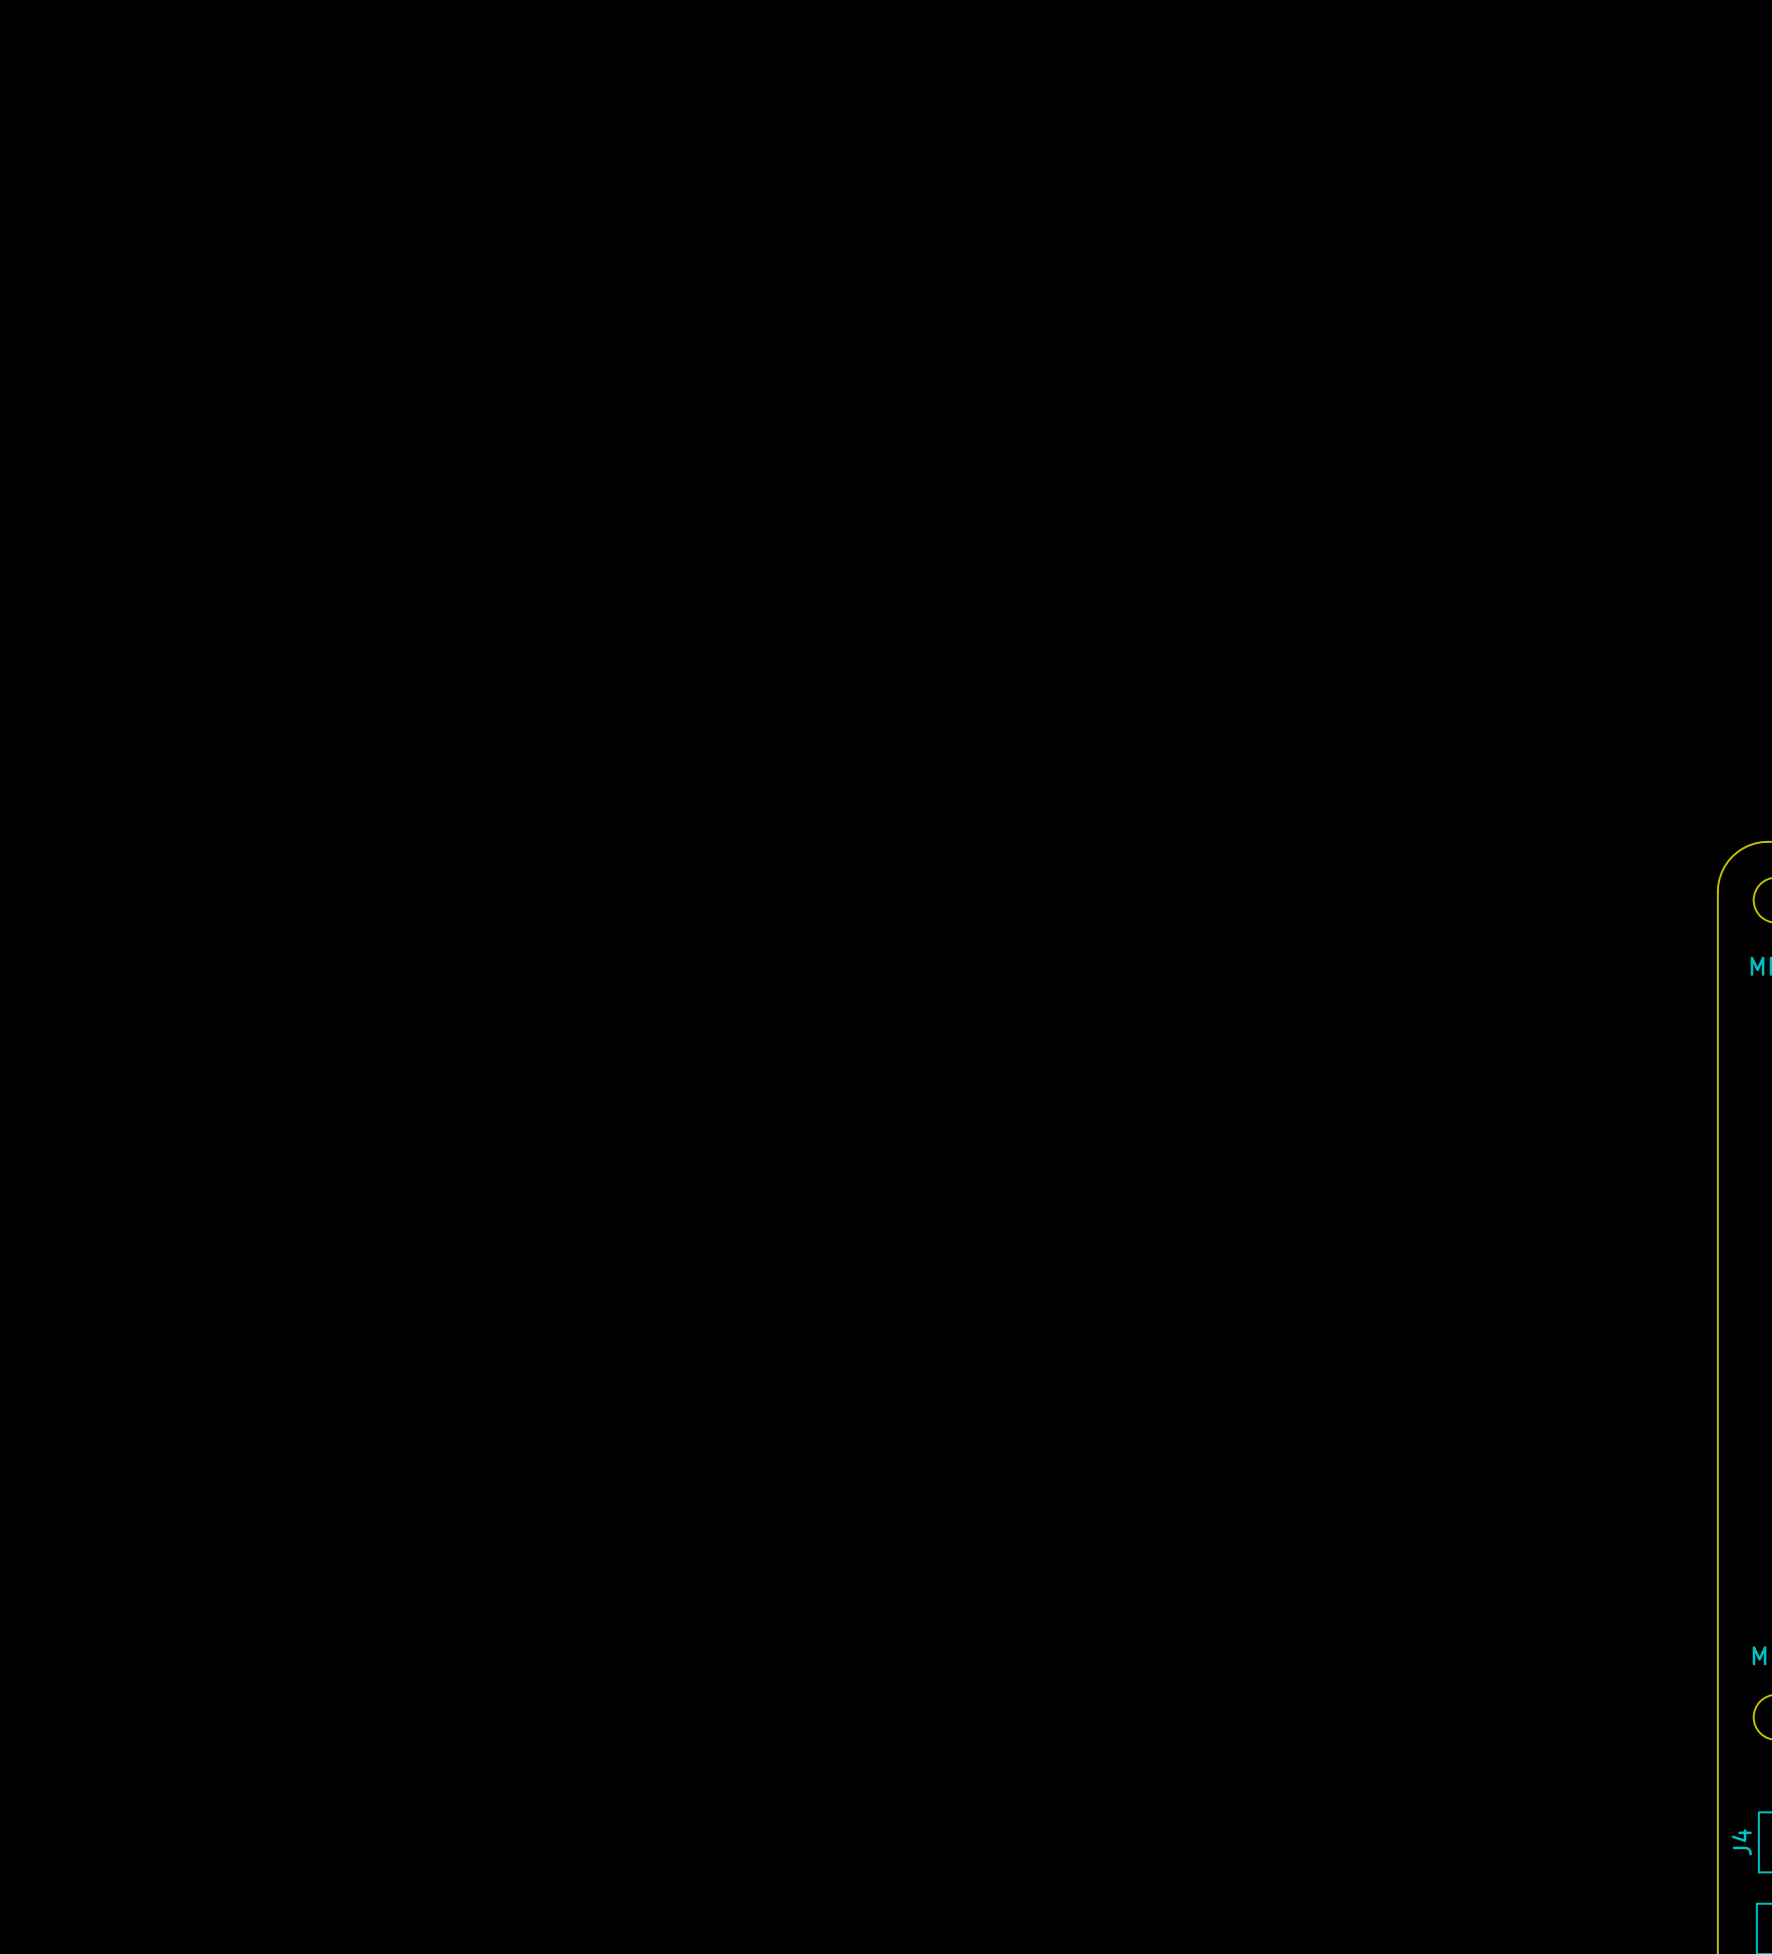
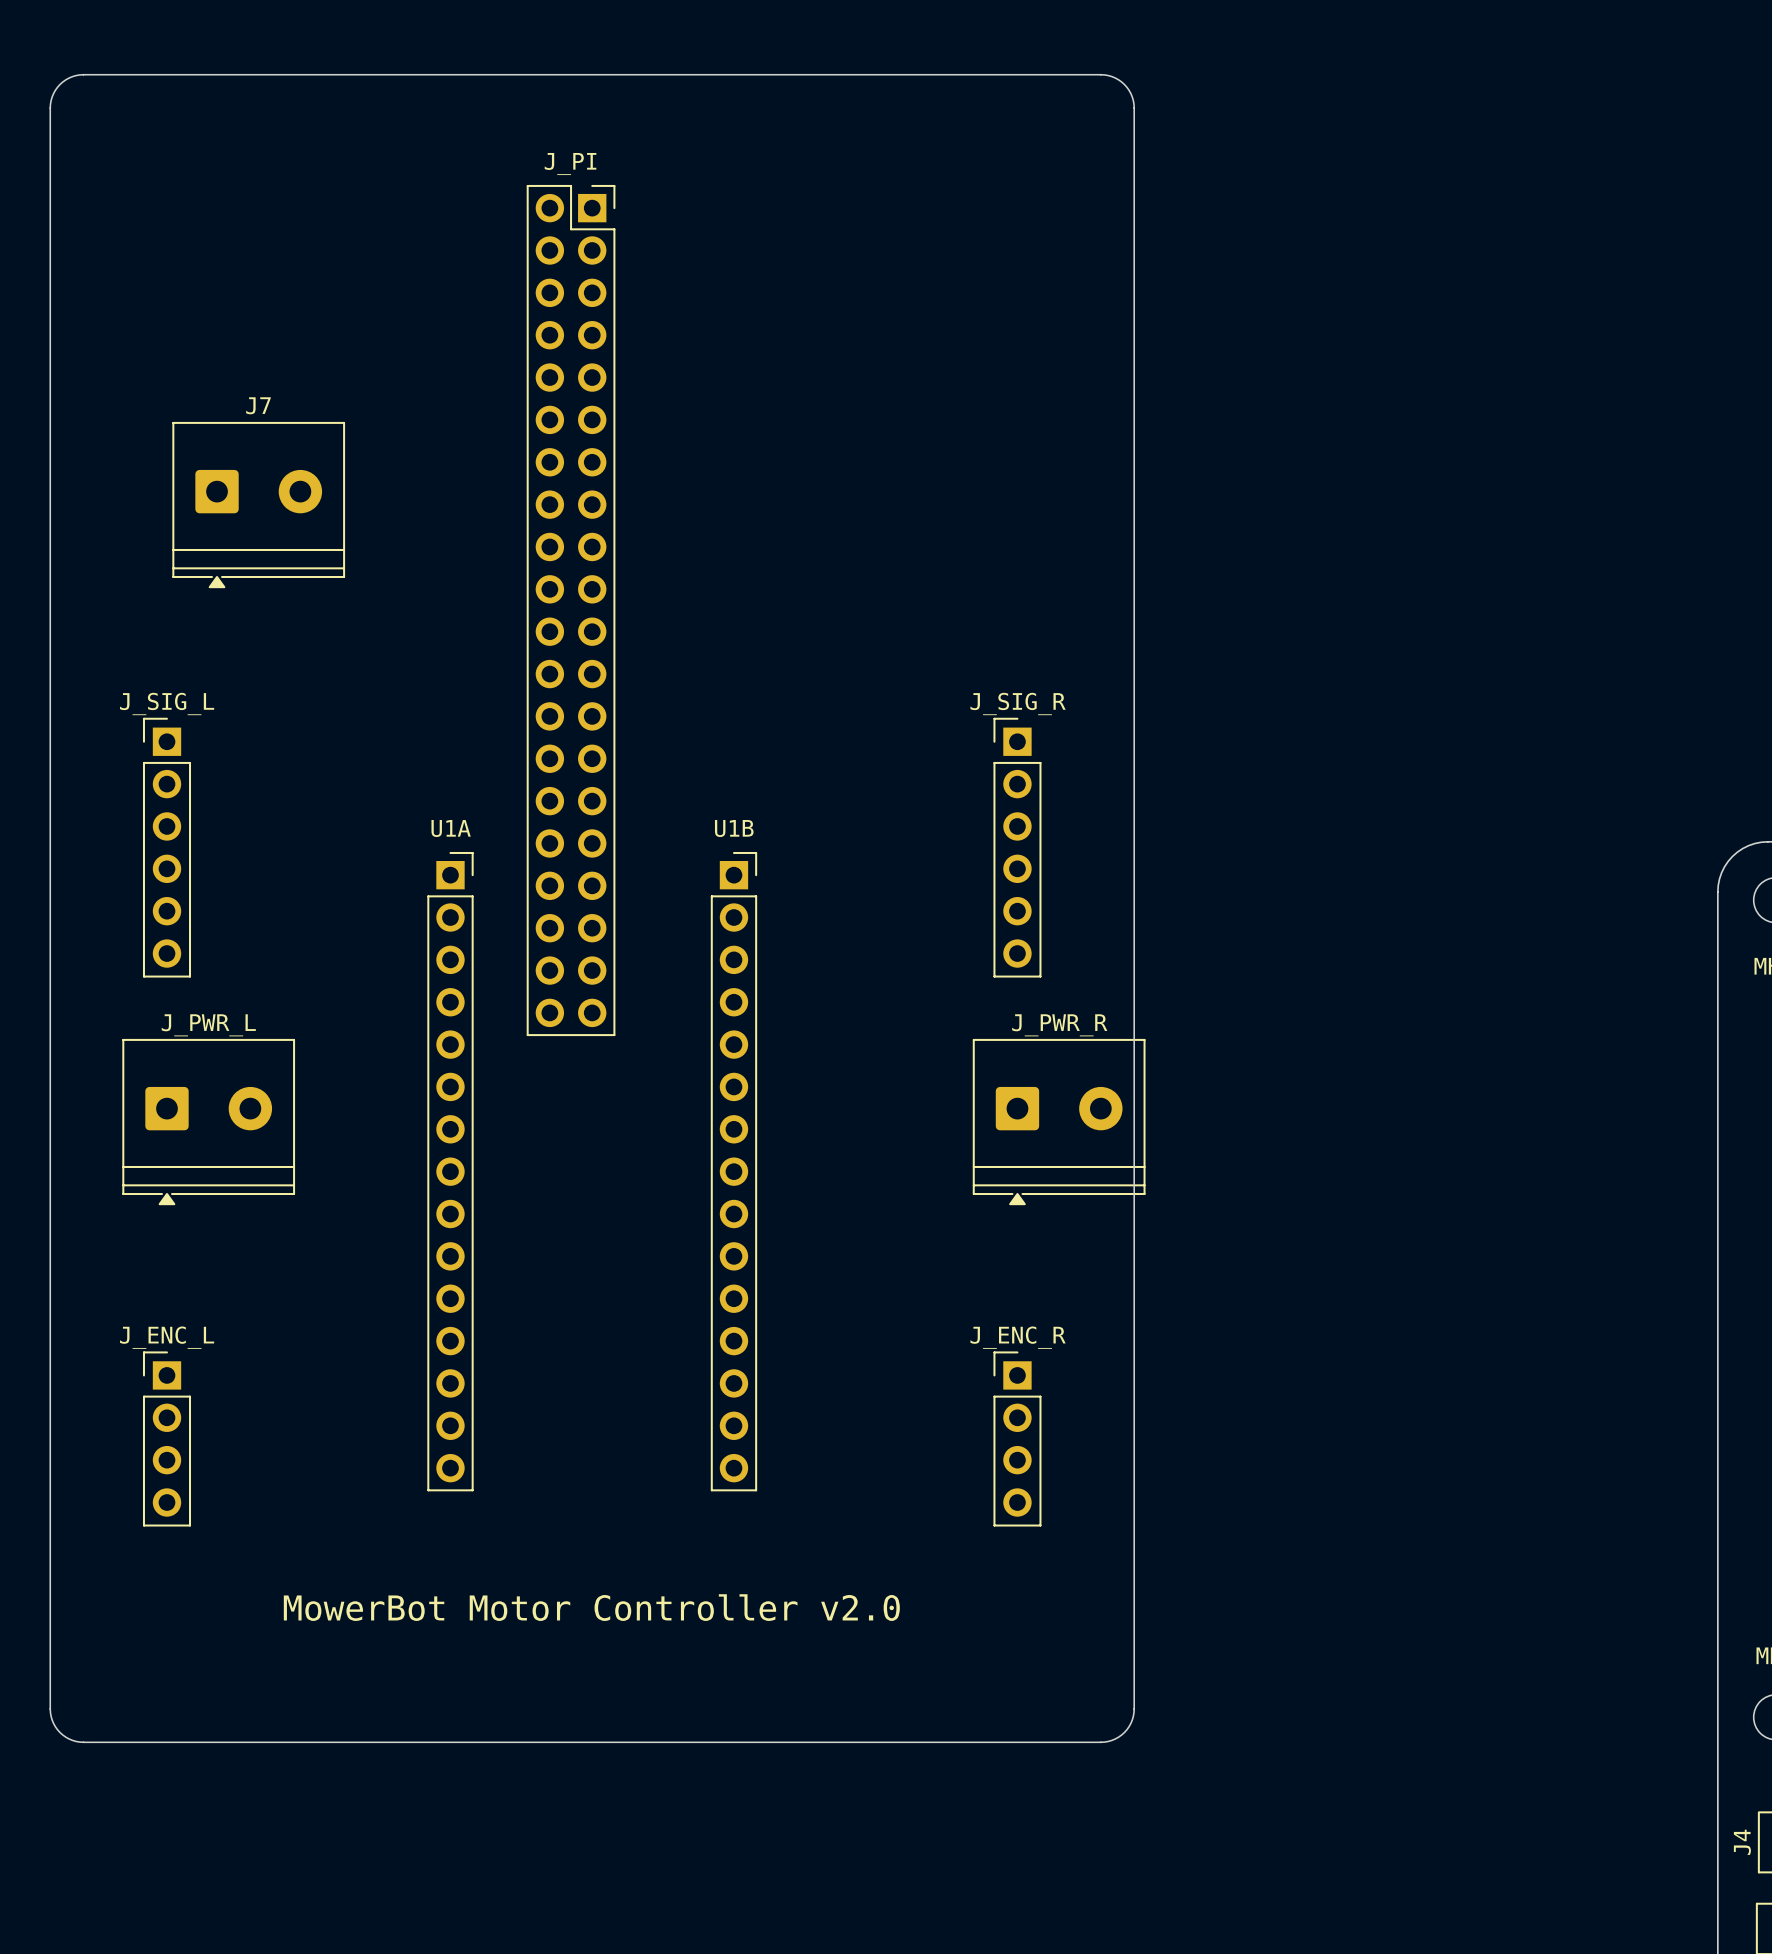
board edge: none -> (83, 74) (1100, 74) (1115, 78) (1129, 90) (1134, 108) (1134, 1708) (1129, 1726) (1118, 1737) (1100, 1742) (83, 1742) (69, 1739) (55, 1726) (50, 1708) (50, 108) (52, 97) (60, 84) (69, 78) (83, 74)
J7: none -> (258, 505)
J_PI: none -> (571, 610)
J_SIG_L: none -> (166, 847)
J_SIG_R: none -> (1017, 847)
J_PWR_L: none -> (208, 1122)
J_PWR_R: none -> (1059, 1122)
U1A: none -> (450, 1171)
U1B: none -> (733, 1171)
J_ENC_L: none -> (166, 1438)
J_ENC_R: none -> (1017, 1438)
text: none -> MowerBot Motor Controller v2.0 (591, 1607)

